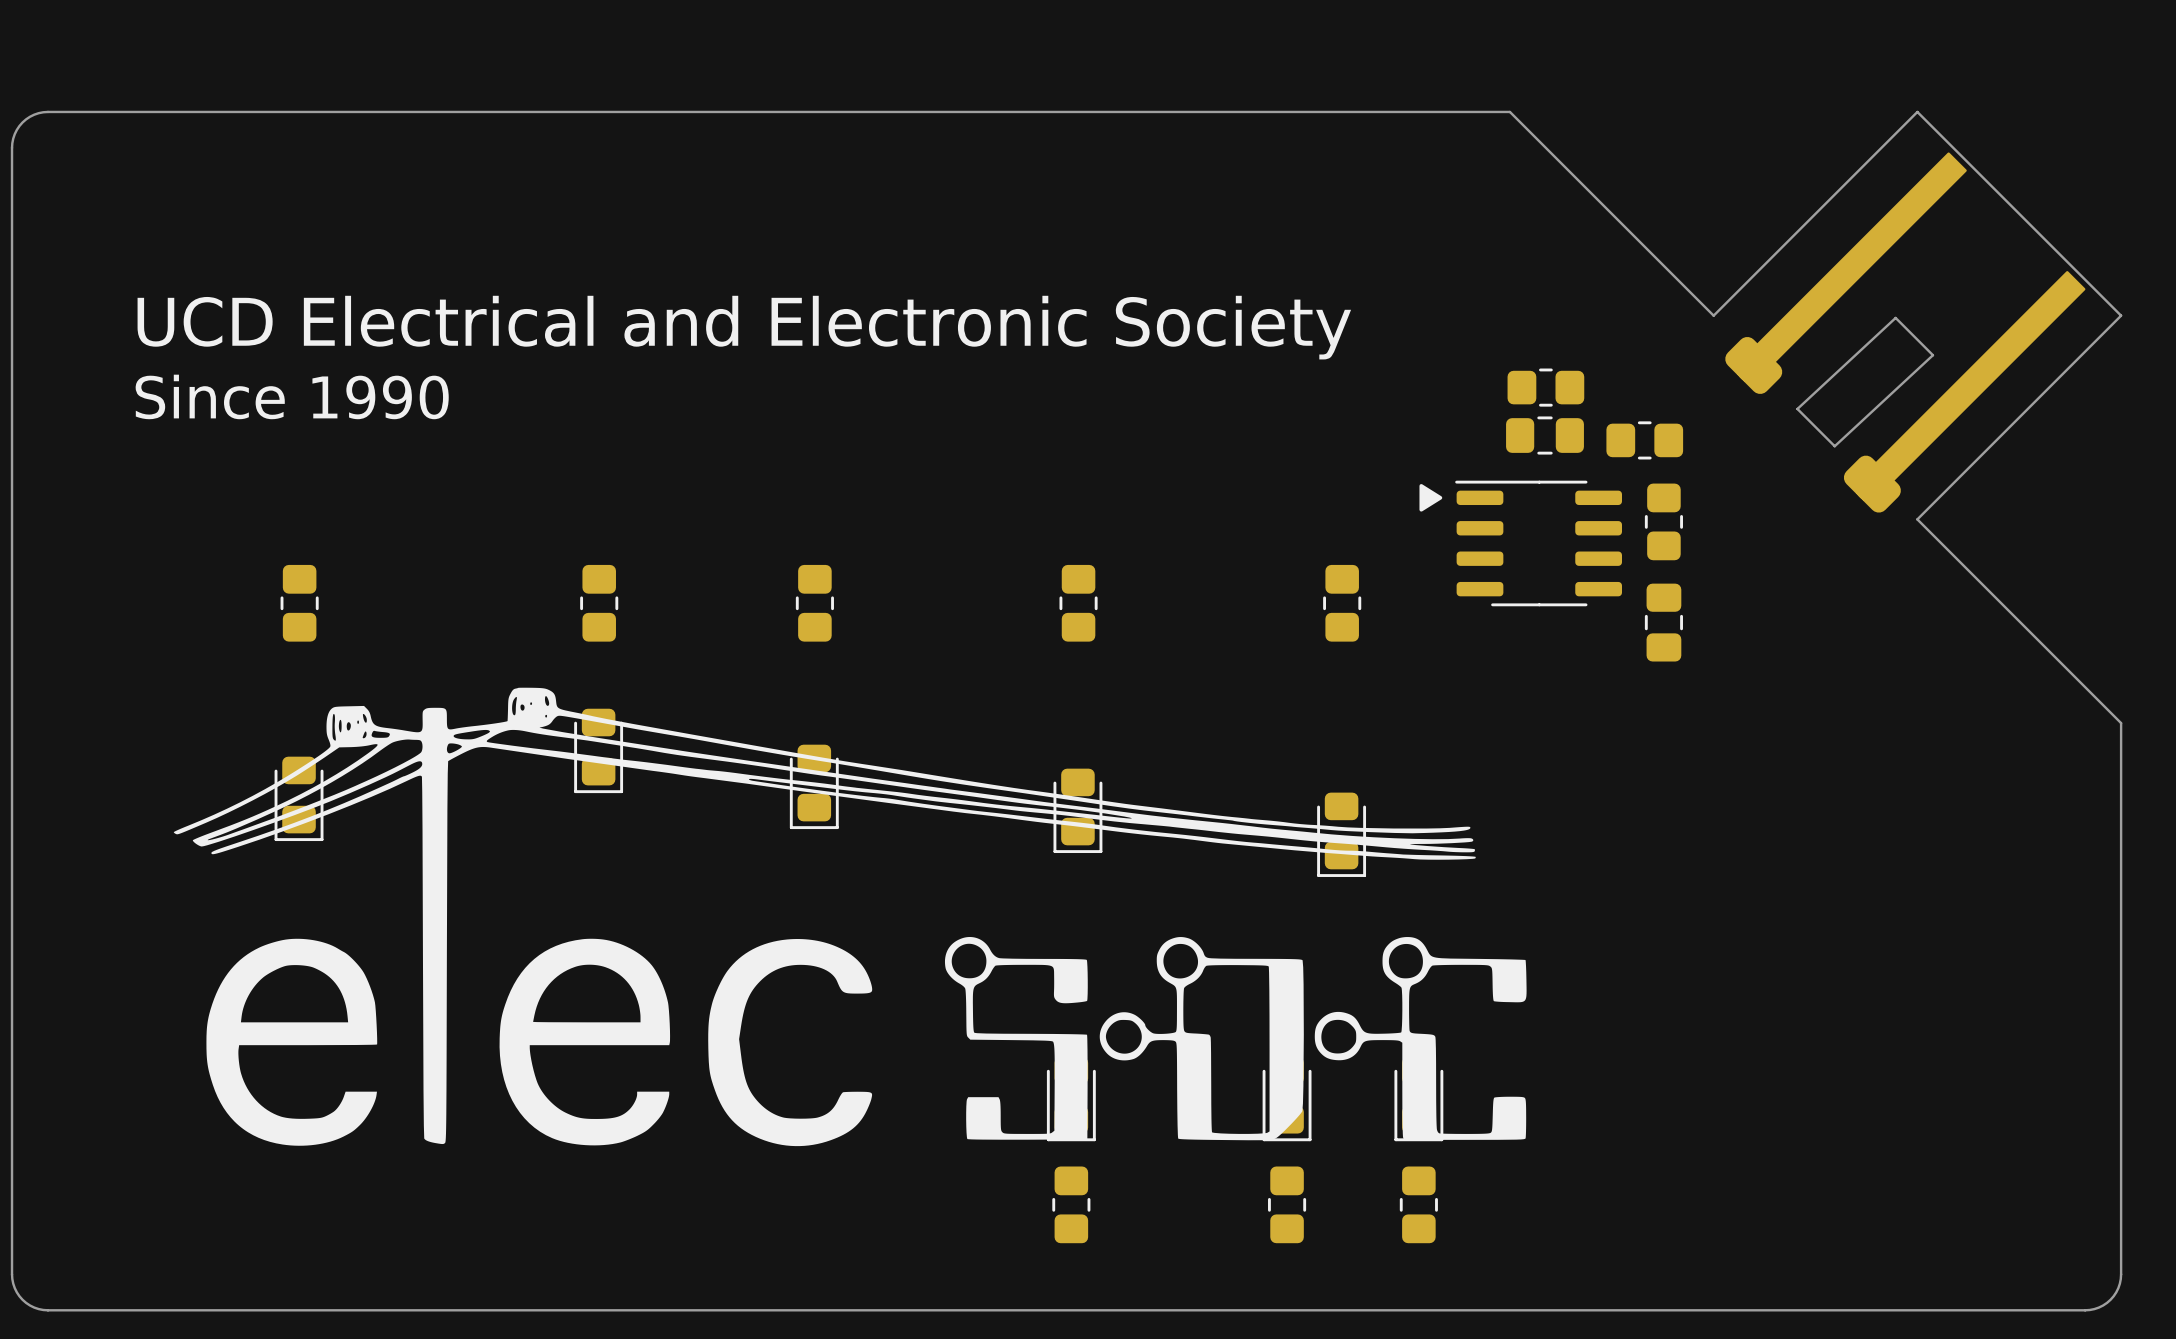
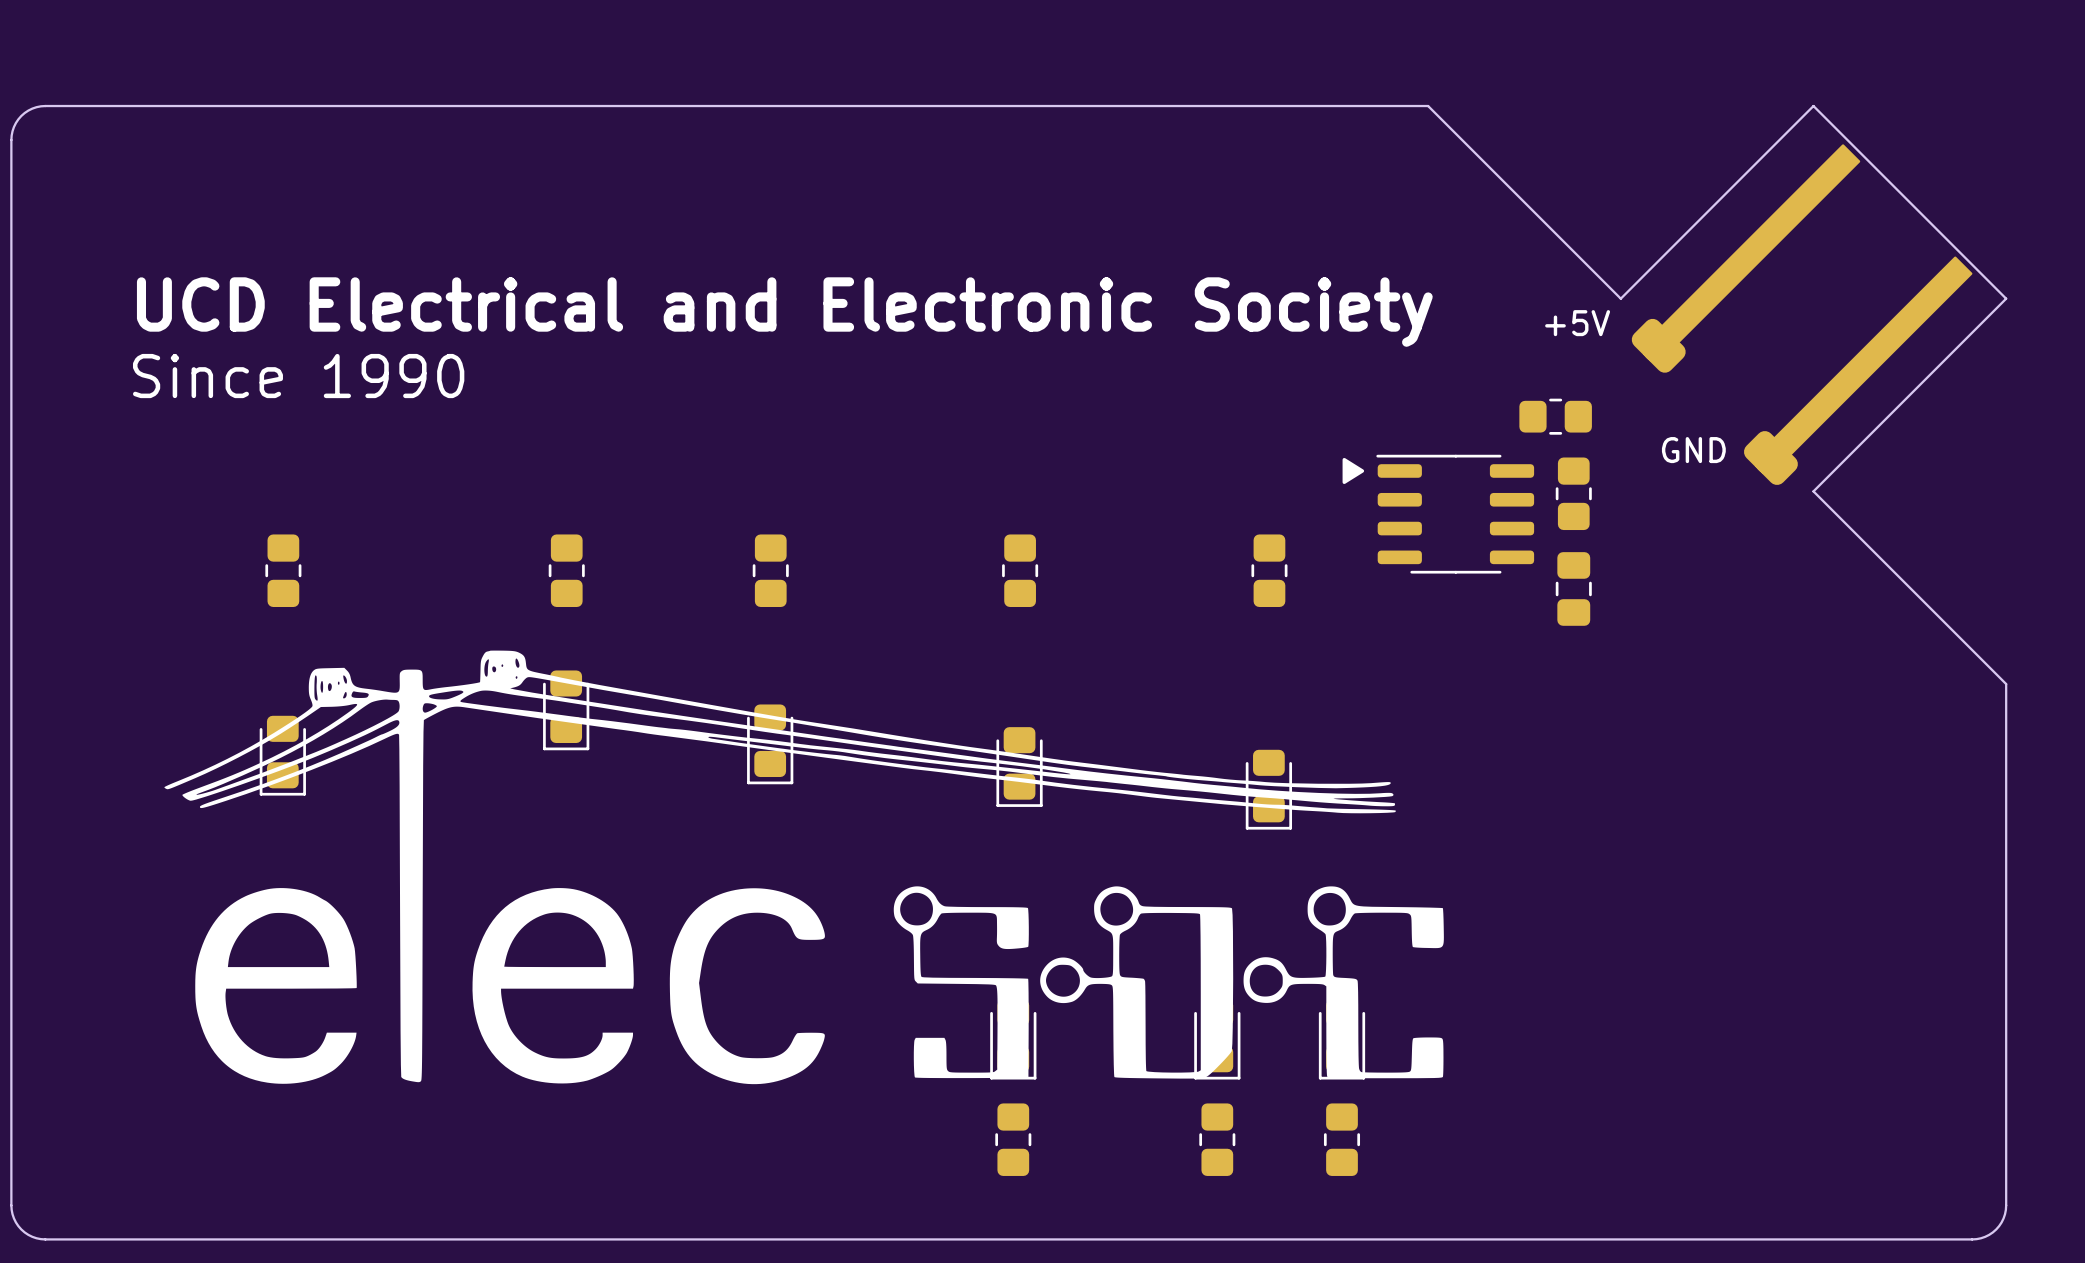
board edge: (1895, 317) (1797, 408) (1834, 446) (1932, 355) (1895, 317) -> none
text: none -> +5V (1577, 323)
part: (1545, 387) -> none
part: (1545, 435) -> none
text: none -> GND (1693, 450)

